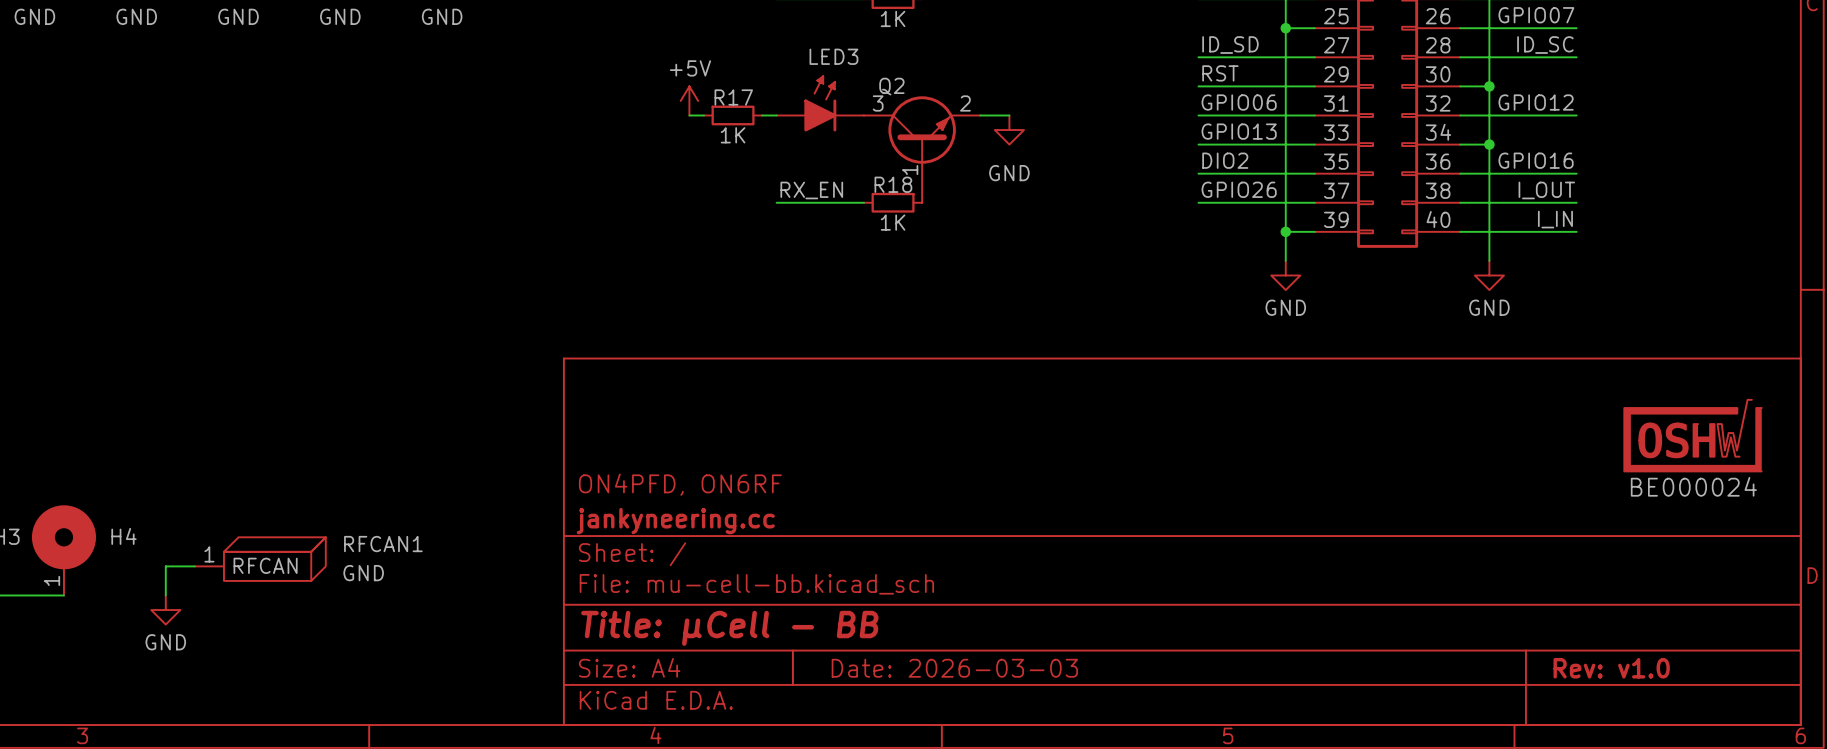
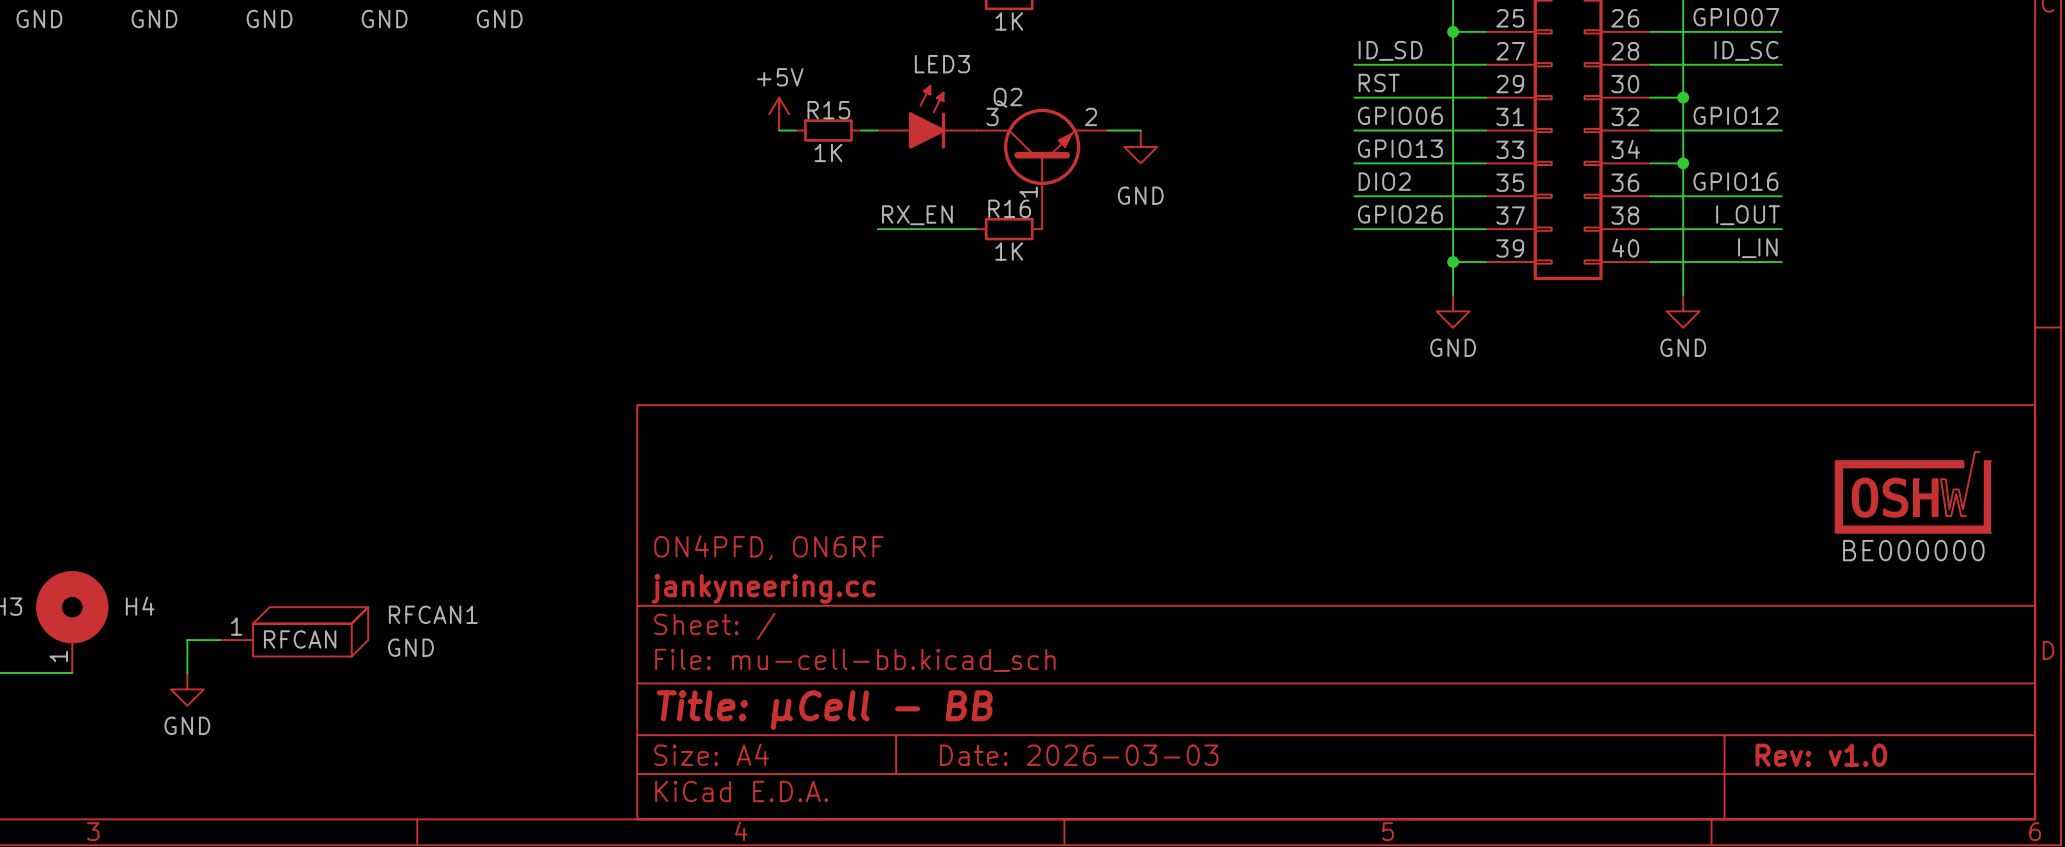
R17 name: R17 (733, 97) -> R15 (828, 110)
R18 name: R18 (893, 184) -> R16 (1009, 208)
BE000024 name: BE000024 (1693, 486) -> BE000000 (1913, 550)

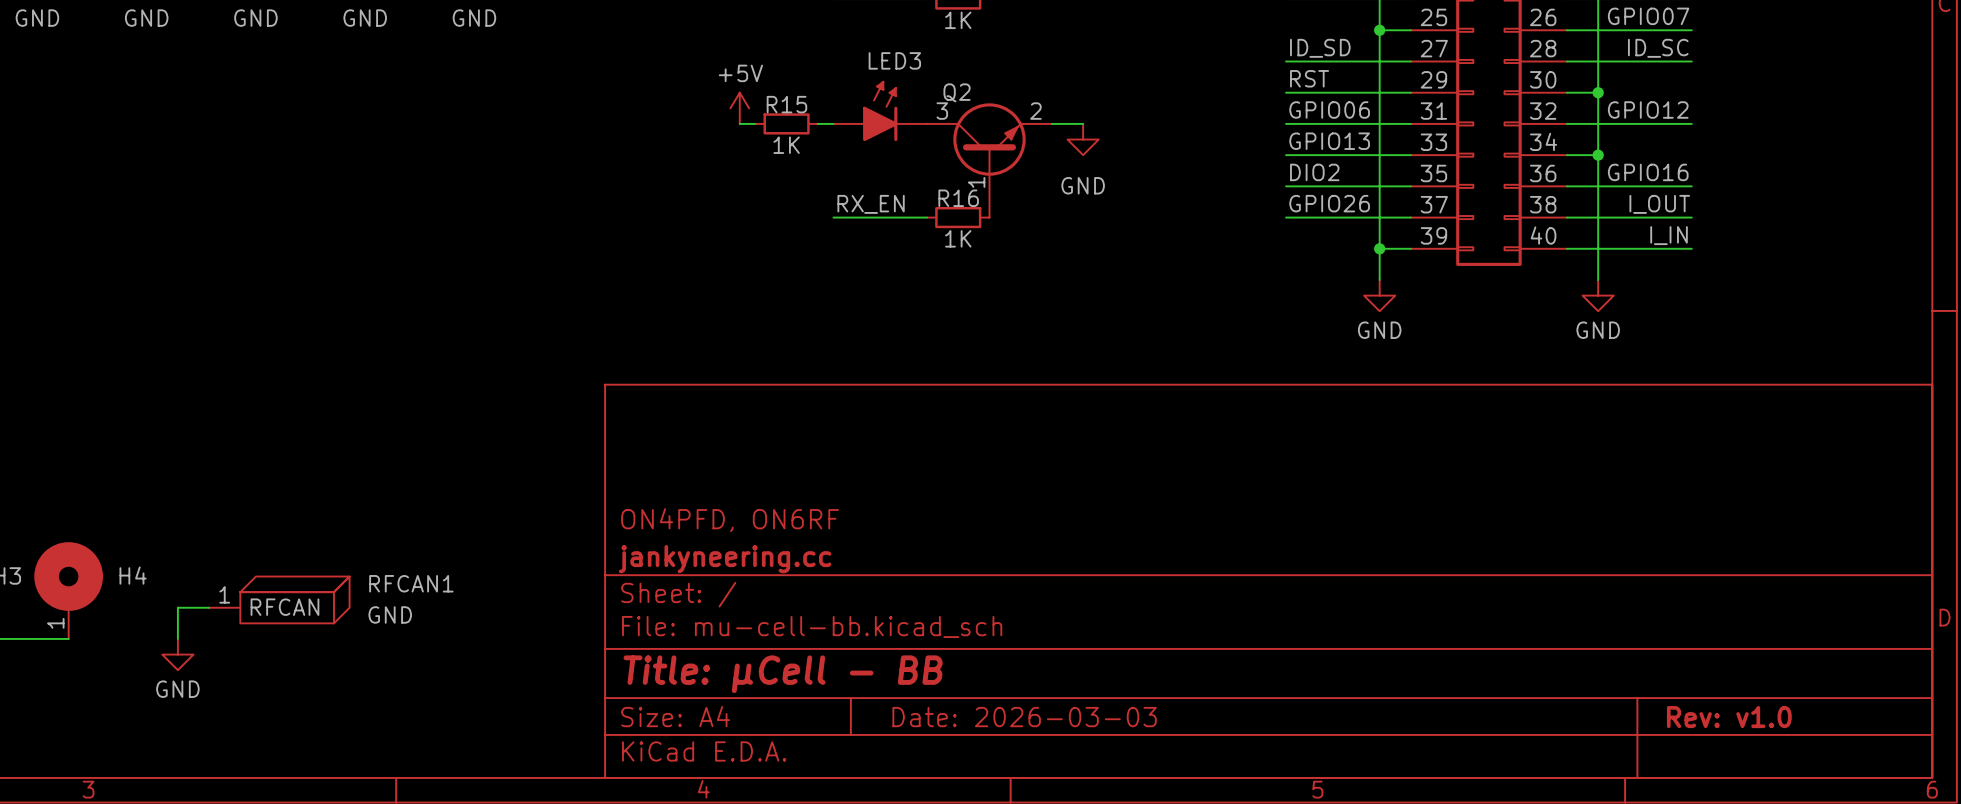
BE000000: (1913, 492) -> none

